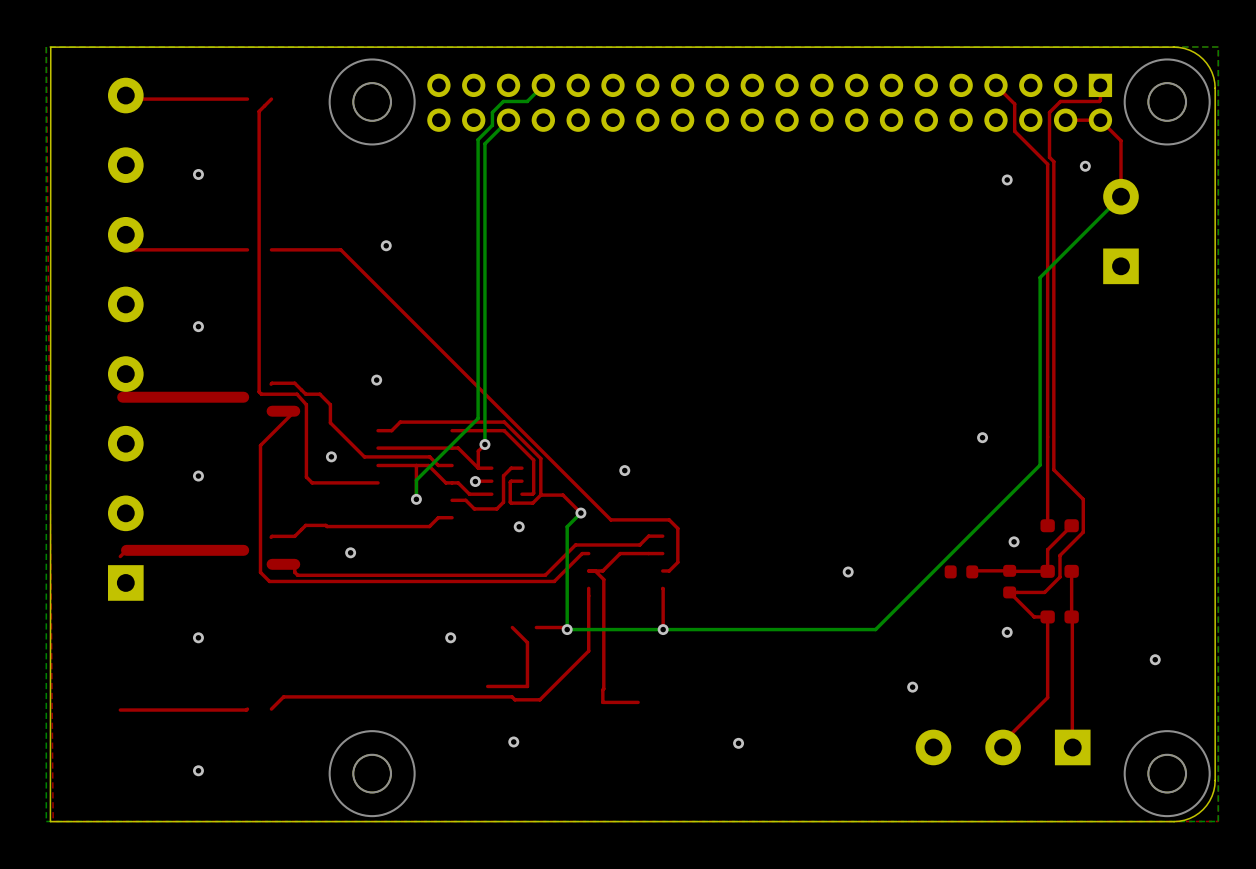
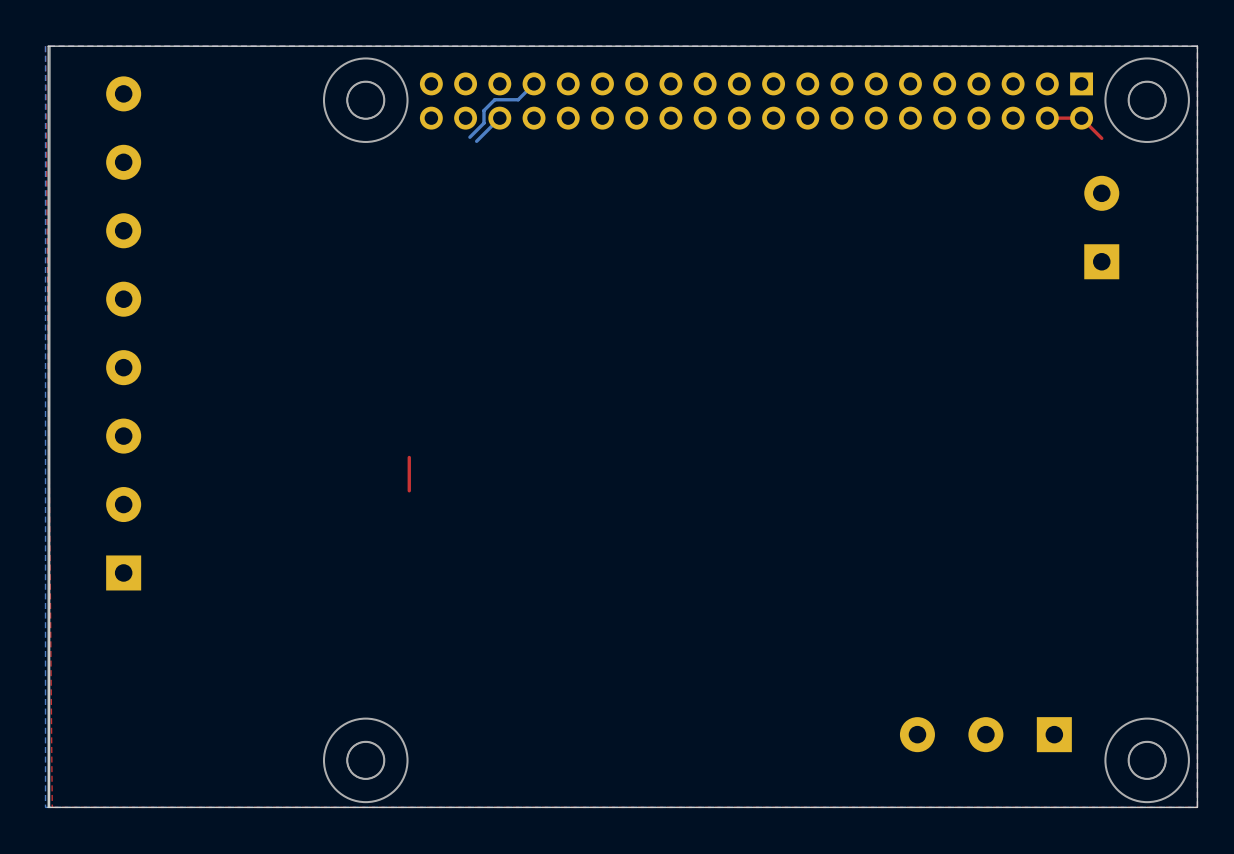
board edge: none -> (1197, 46) (1197, 807) (48, 807) (48, 46) (1197, 46)
board edge: (50, 47) (1174, 47) (1189, 50) (1203, 59) (1212, 72) (1215, 88) -> none
top track: (995, 85) (1014, 104) (1014, 131) (1047, 164) (1047, 525) -> none
top track: (1100, 85) (1099, 101) (1060, 101) (1049, 112) (1049, 157) (1053, 161) (1053, 469) (1083, 499) (1083, 532) (1059, 555) (1059, 577) (1044, 592) (1009, 592) (1034, 616) (1047, 616) (1047, 697) (1002, 742) -> none
board edge: (1215, 88) (1215, 780) (1209, 801) (1194, 816) (1174, 821) (50, 821) -> none
top track: (120, 89) (130, 99) (247, 99) -> none
top track: (271, 99) (259, 111) (259, 391) (261, 394) (297, 394) (306, 404) (306, 477) (312, 482) (378, 482) -> none
bottom track: (478, 139) (478, 418) (416, 480) (416, 499) -> none
top track: (1120, 140) (1120, 196) -> none
bottom track: (484, 143) (484, 444) -> none
via: (1085, 166) -> none
via: (198, 174) -> none
via: (1007, 179) -> none
bottom track: (1120, 196) (1040, 277) (1040, 465) (875, 629) (567, 629) (567, 526) (580, 513) -> none
via: (386, 245) -> none
top track: (120, 246) (123, 249) (247, 249) -> none
top track: (271, 249) (340, 249) (610, 519) (669, 519) (677, 528) (677, 562) (669, 570) (662, 570) -> none
via: (198, 326) -> none
via: (376, 380) -> none
top track: (271, 384) (294, 383) (305, 394) (319, 394) (330, 404) (330, 422) (364, 456) (429, 456) (438, 465) (452, 465) -> none
top track: (243, 397) (122, 397) (120, 399) -> none
top track: (271, 410) (294, 411) (260, 445) (260, 572) (269, 581) (554, 581) (582, 553) (588, 553) -> none
top track: (378, 430) (391, 430) (400, 422) (504, 422) (540, 458) (540, 495) -> none
top track: (452, 430) (504, 430) (533, 460) (533, 493) (521, 494) -> none
via: (982, 437) -> none
top track: (484, 444) (478, 451) (478, 468) -> none
via: (484, 444) -> none
top track: (378, 448) (458, 448) (478, 468) -> none
via: (331, 456) -> none
top track: (378, 465) (428, 465) (445, 482) (458, 482) (469, 494) (491, 494) -> none
top track: (491, 468) (478, 468) -> none
top track: (521, 468) (511, 468) (503, 475) (503, 502) (496, 508) (474, 508) (465, 500) (452, 500) -> none
via: (624, 470) -> none
via: (198, 476) -> none
via: (475, 481) -> none
top track: (491, 481) (475, 481) -> none
top track: (521, 481) (510, 482) (511, 503) (532, 503) (540, 495) -> none
top track: (540, 495) (562, 495) (580, 513) -> none
via: (416, 499) -> none
via: (580, 513) -> none
top track: (452, 517) (438, 517) (429, 526) (305, 525) (294, 536) (271, 537) -> none
part: (1059, 525) -> none
top track: (1071, 525) (1047, 549) (1047, 571) (972, 571) -> none
via: (519, 526) -> none
top track: (662, 536) (648, 536) (639, 544) (575, 544) (545, 575) (297, 575) (294, 572) (294, 564) (271, 563) -> none
via: (1014, 541) -> none
top track: (243, 550) (126, 550) (120, 556) -> none
via: (350, 552) -> none
top track: (662, 553) (620, 553) (602, 570) (588, 570) -> none
top track: (595, 570) (603, 579) (602, 702) -> none
part: (961, 571) -> none
part: (1059, 571) -> none
top track: (1071, 571) (1072, 742) -> none
via: (848, 572) -> none
part: (1009, 581) -> none
top track: (588, 588) (588, 651) (539, 699) (514, 699) (512, 696) (283, 696) (271, 709) -> none
top track: (662, 588) (663, 629) -> none
part: (1059, 616) -> none
top track: (512, 627) (527, 642) (527, 686) (487, 686) -> none
top track: (536, 627) (565, 627) (567, 629) -> none
via: (567, 629) -> none
via: (663, 629) -> none
via: (1007, 632) -> none
via: (198, 637) -> none
via: (450, 637) -> none
via: (1155, 659) -> none
via: (912, 687) -> none
top track: (638, 702) (603, 702) -> none
top track: (247, 709) (120, 710) -> none
via: (513, 741) -> none
via: (738, 743) -> none
via: (198, 770) -> none

